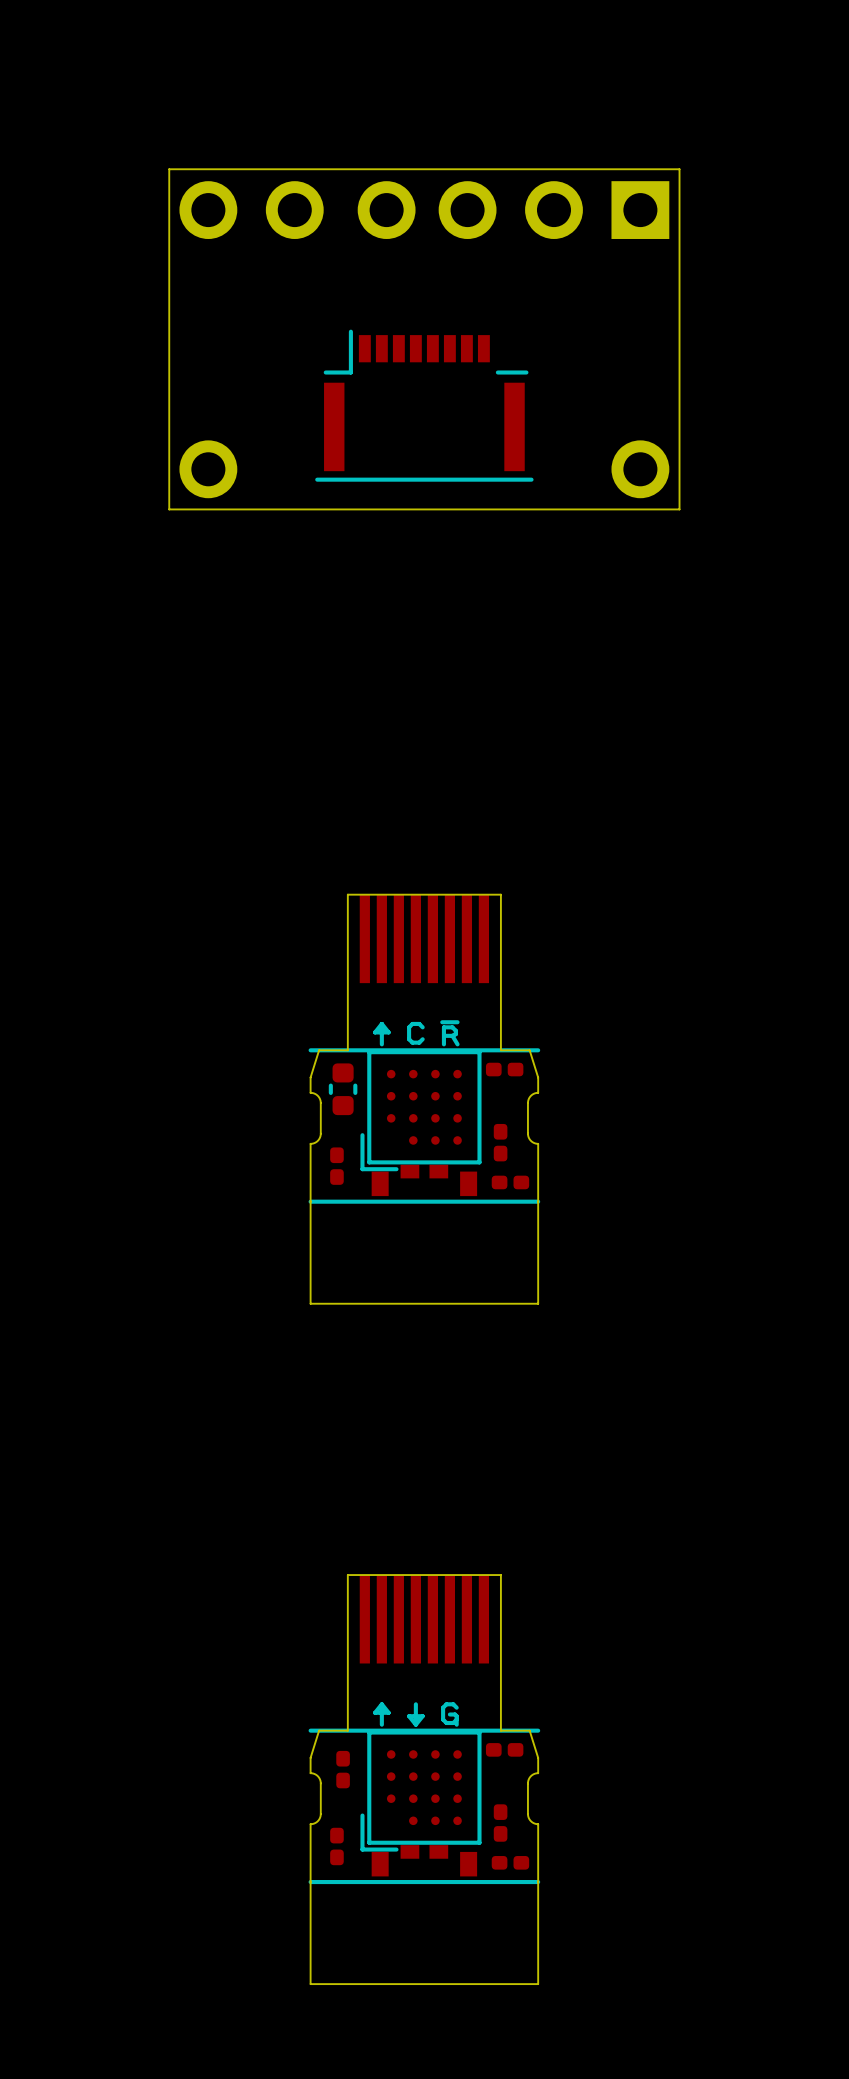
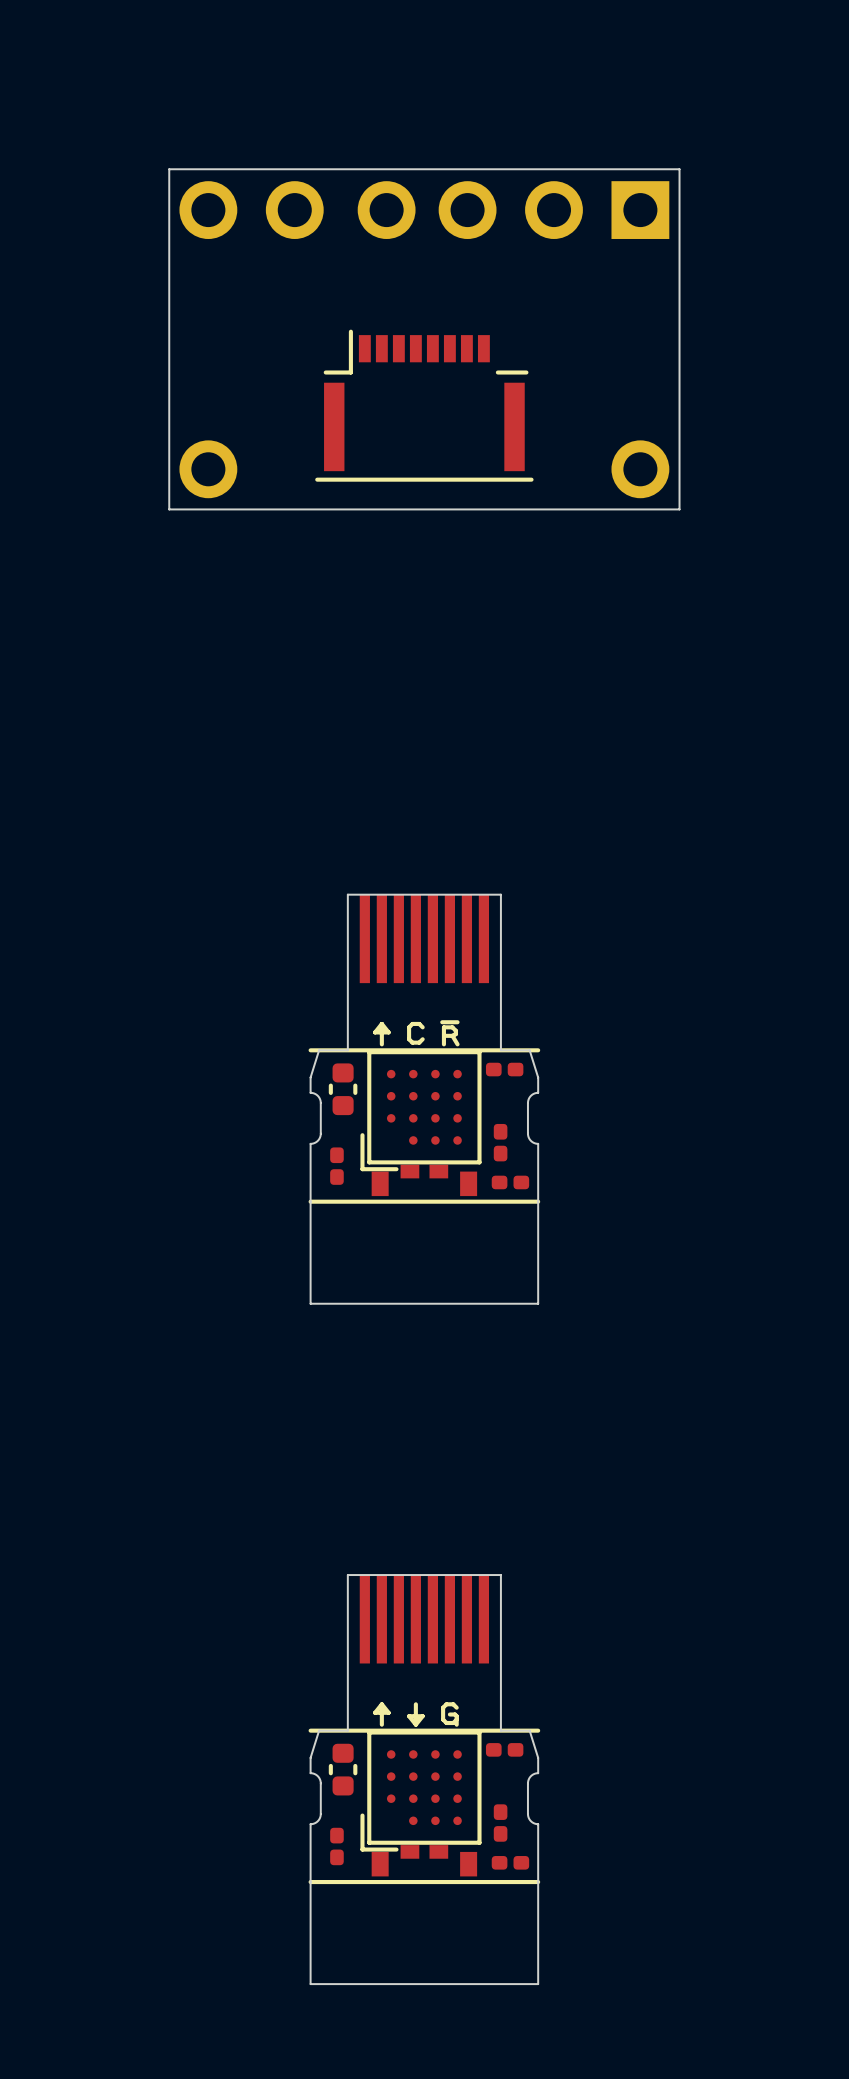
part footprint: [336, 1750, 350, 1789] -> [328, 1743, 358, 1796]

